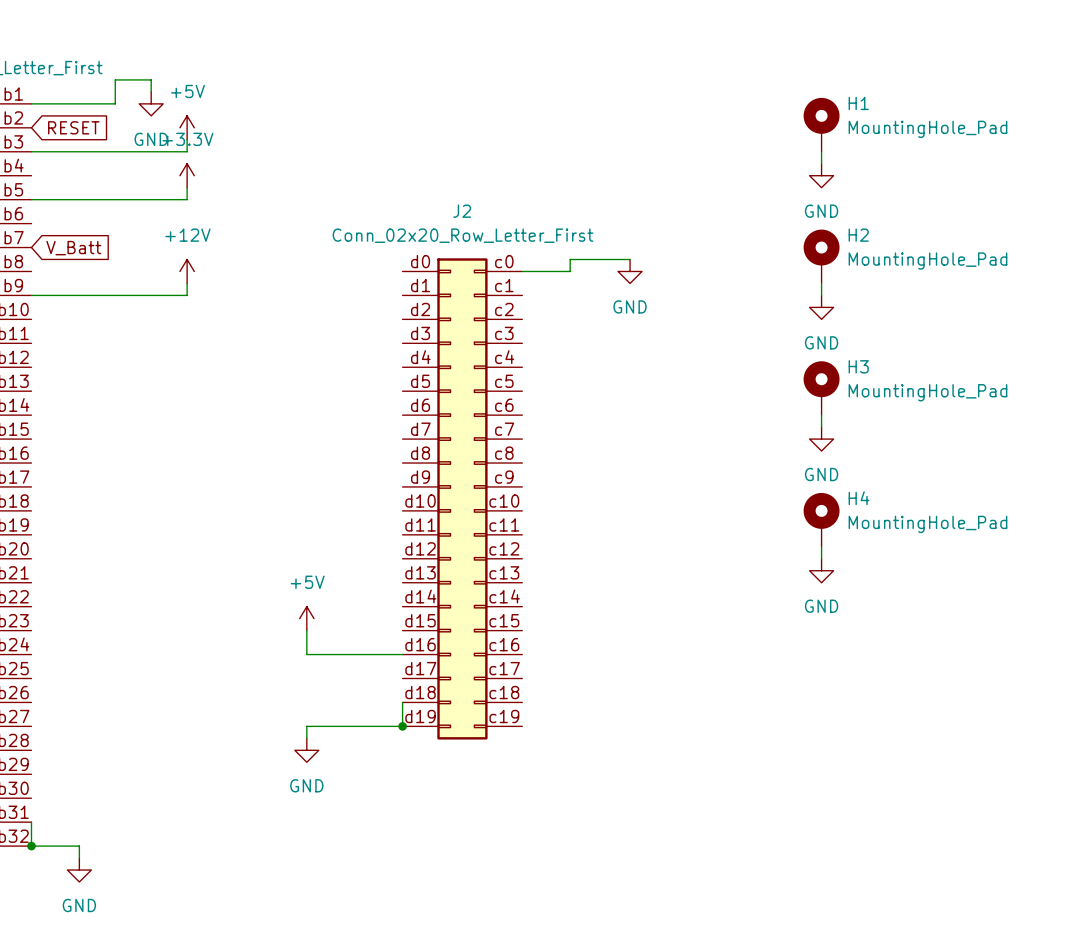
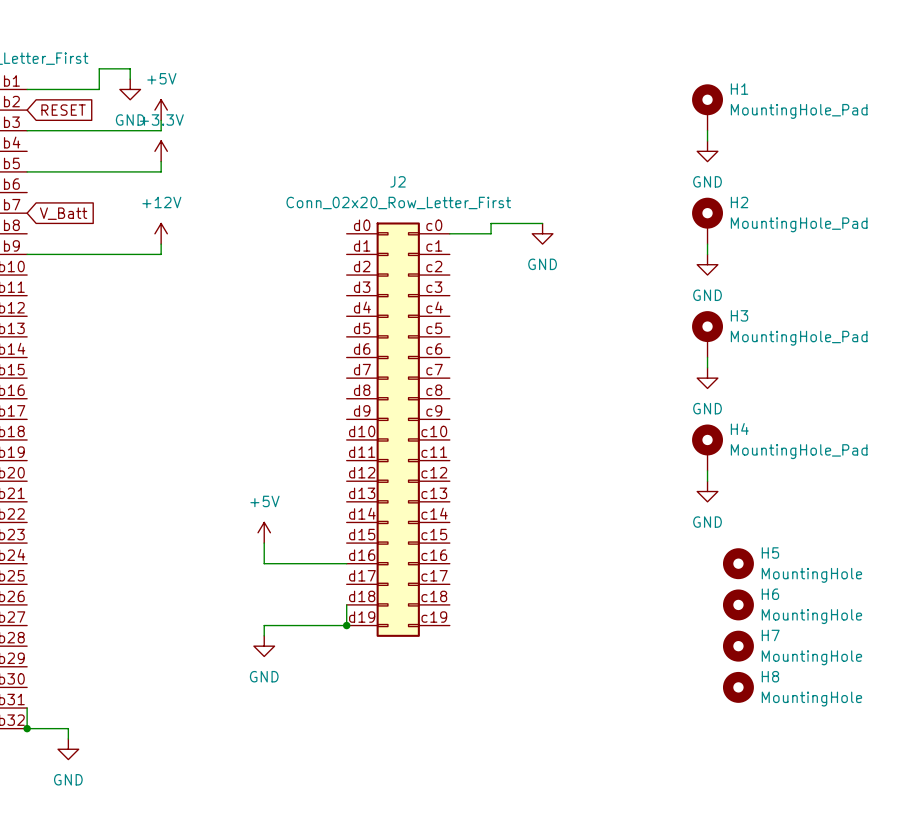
H5: none -> MountingHole (738, 563)
H6: none -> MountingHole (738, 604)
H7: none -> MountingHole (738, 646)
H8: none -> MountingHole (738, 687)

